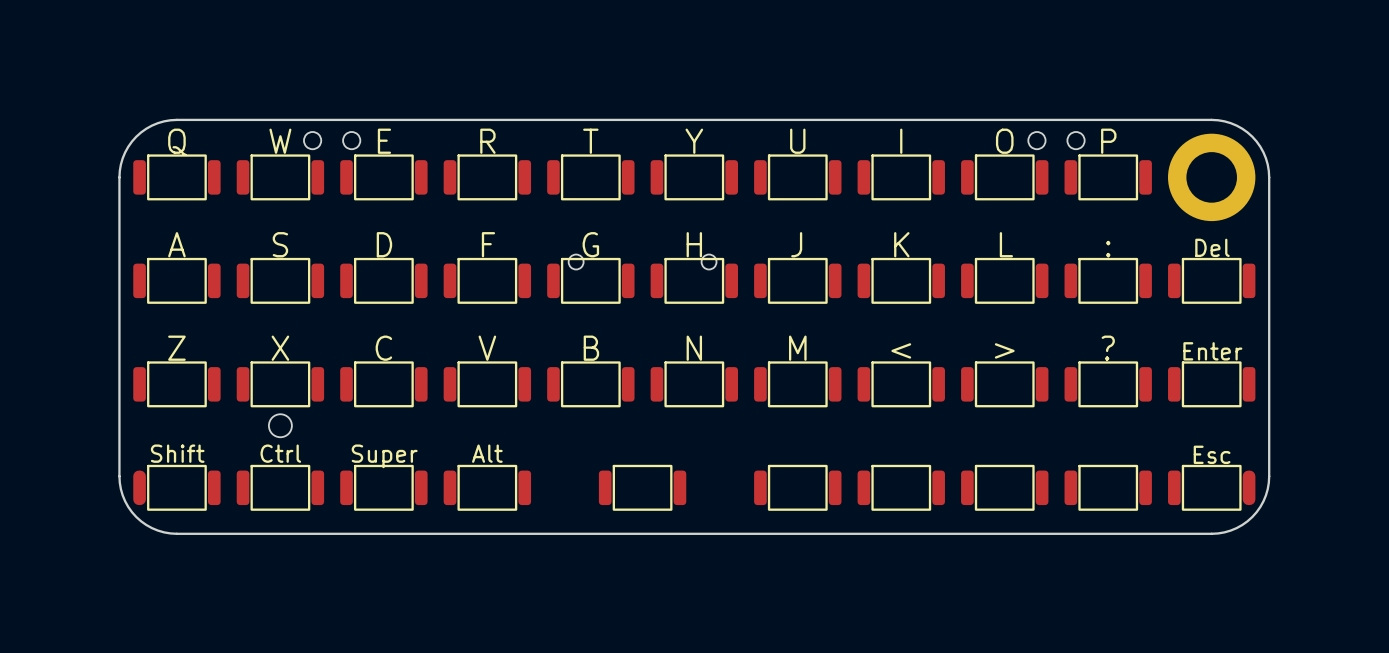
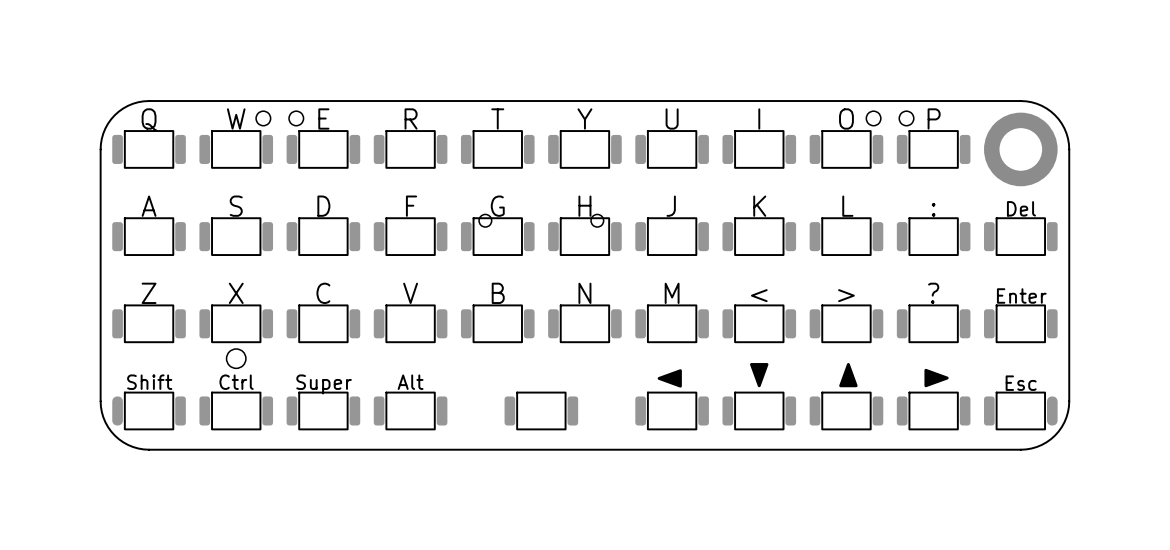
drawing: none -> [750, 363, 769, 388]
drawing: none -> [839, 363, 858, 388]
drawing: none -> [924, 368, 949, 388]
drawing: none -> [657, 369, 682, 388]

